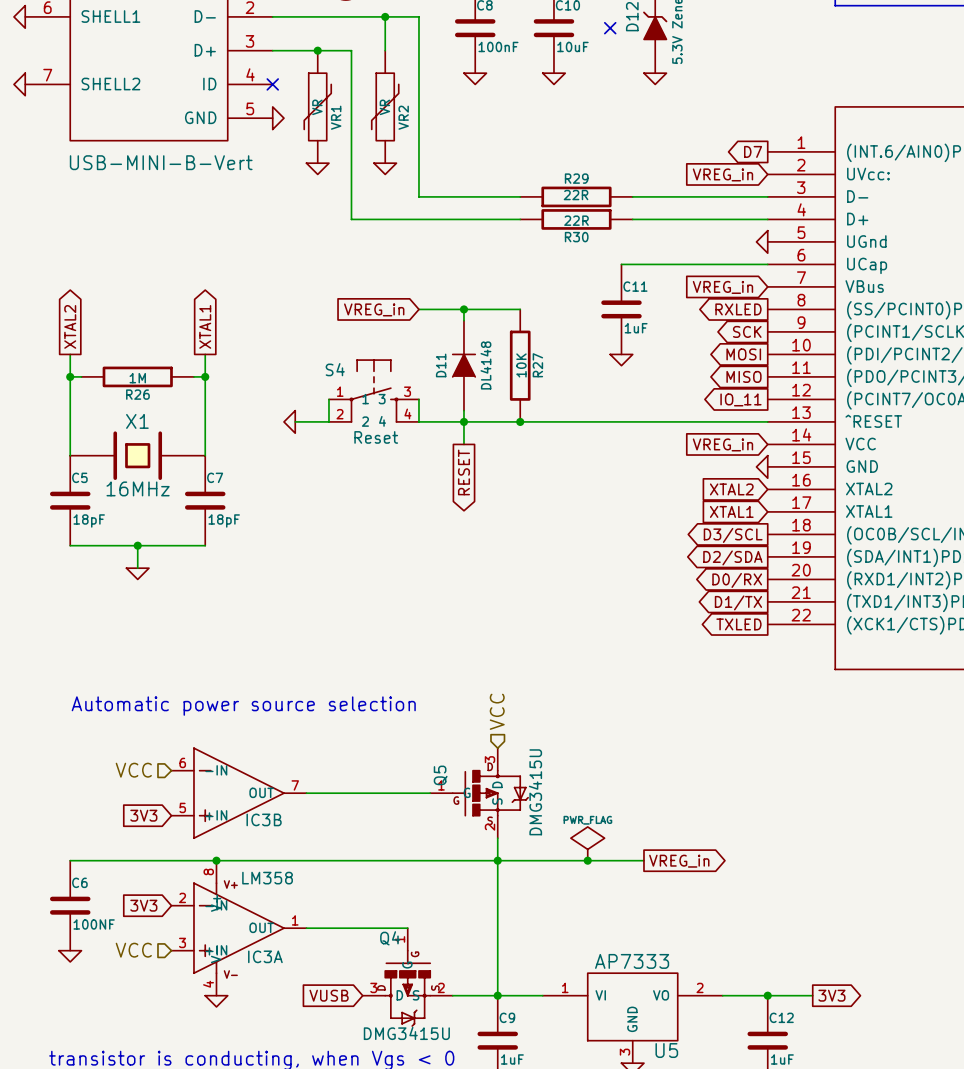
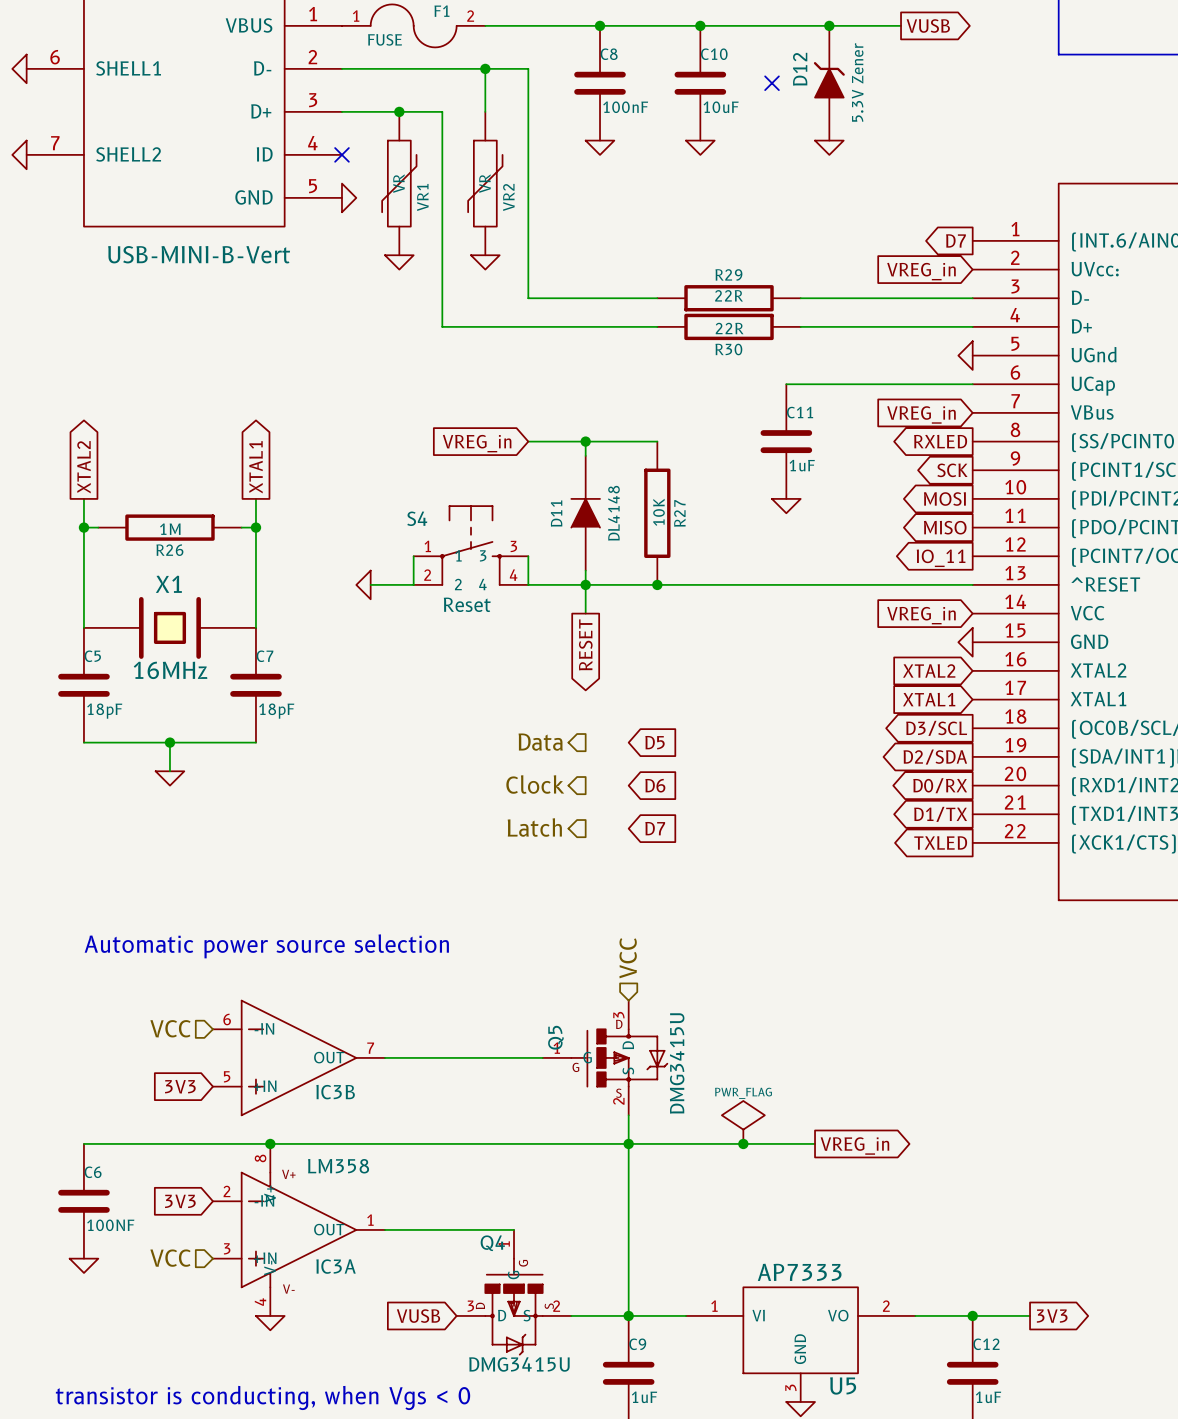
hierarchical label: none -> Data (540, 742)
global label: none -> D5 (655, 742)
hierarchical label: none -> Clock (535, 784)
global label: none -> D6 (655, 785)
hierarchical label: none -> Latch (534, 827)
global label: none -> D7 (655, 828)

